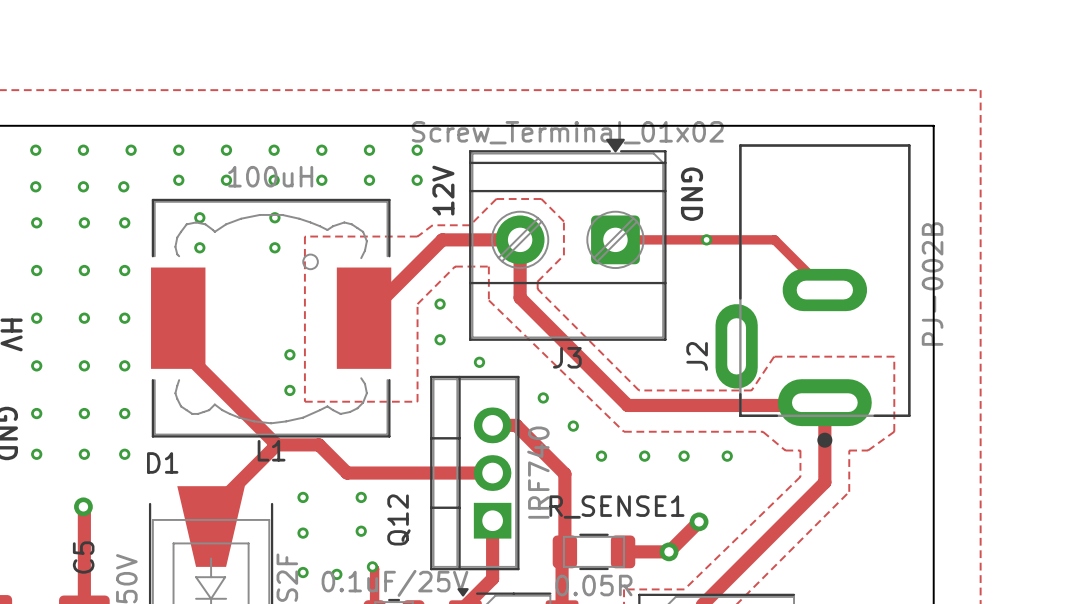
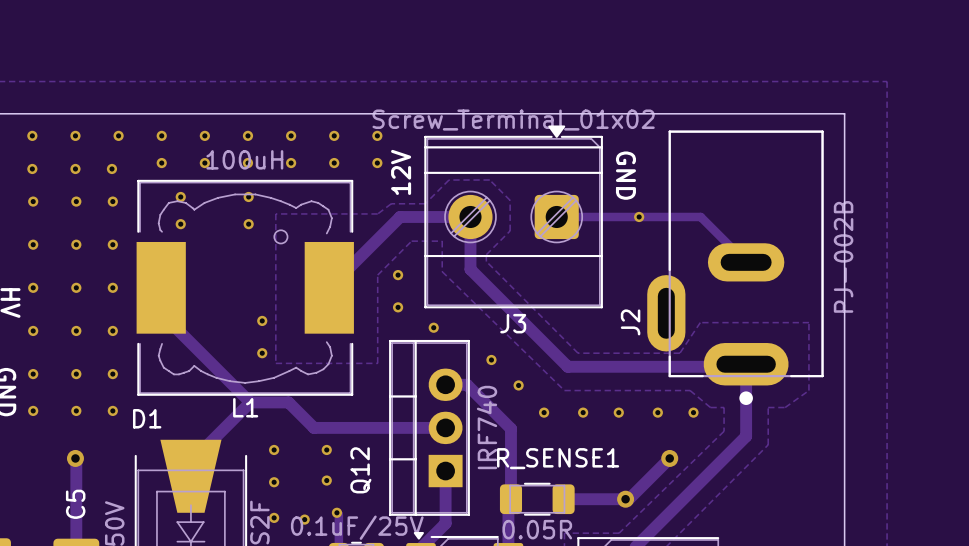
via: none -> (693, 412)
via: none -> (669, 458)
track: (699, 521) (669, 551) -> (669, 458) (628, 499) (605, 499)
via: (699, 521) -> none
via: (669, 551) -> none
via: none -> (625, 499)

